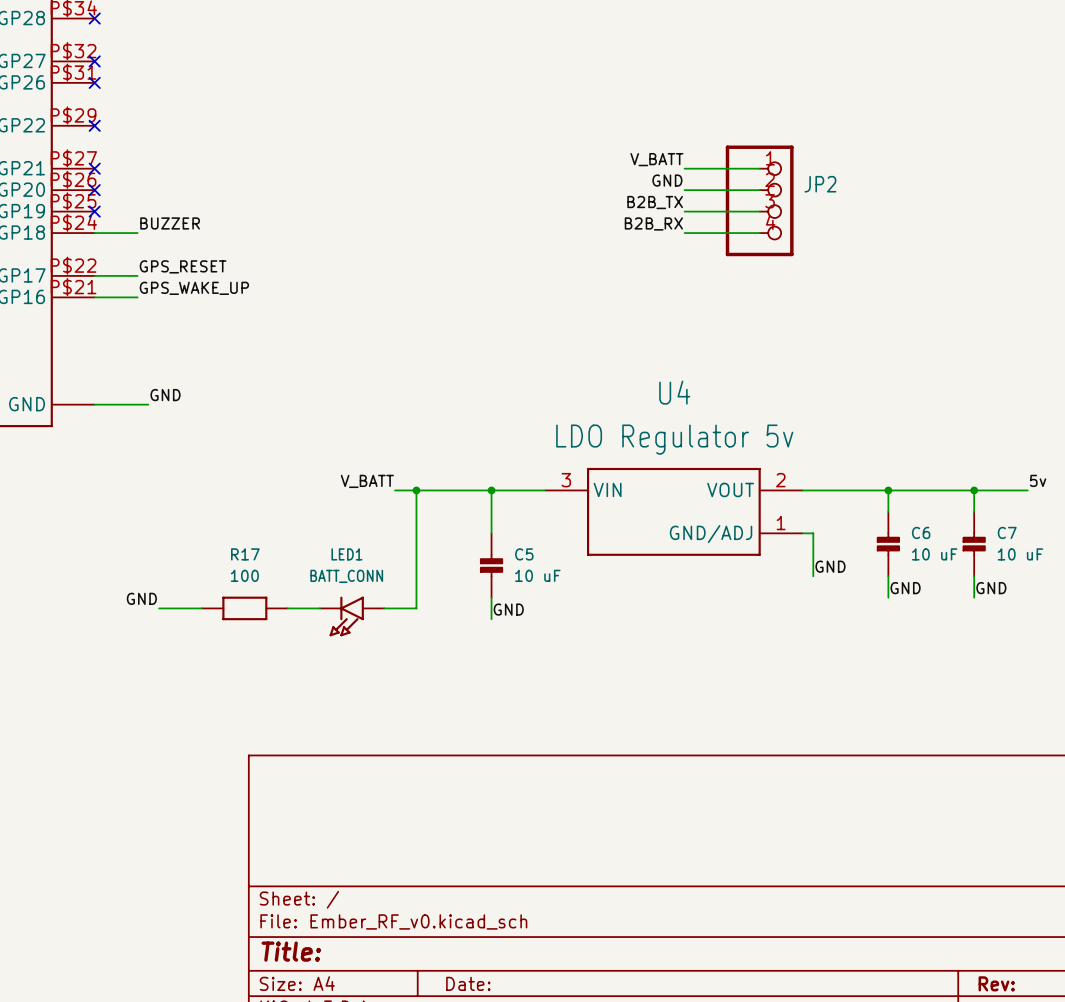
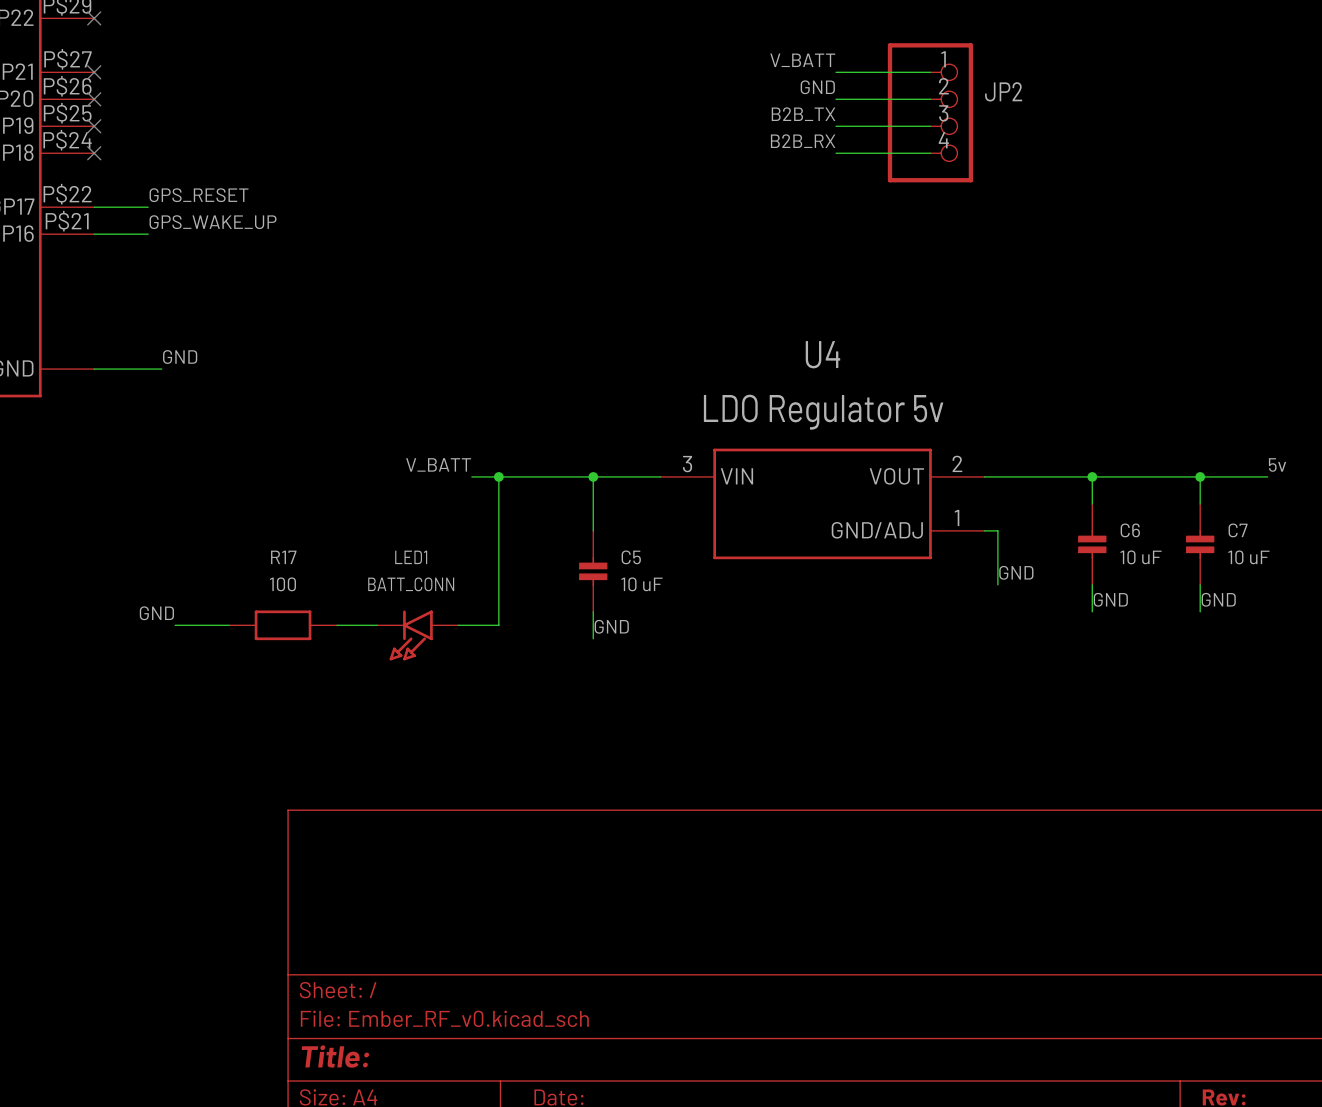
label: BUZZER (170, 223) -> none
wire: (94, 233) (137, 233) -> none
no-connect mark: none -> (94, 153)

